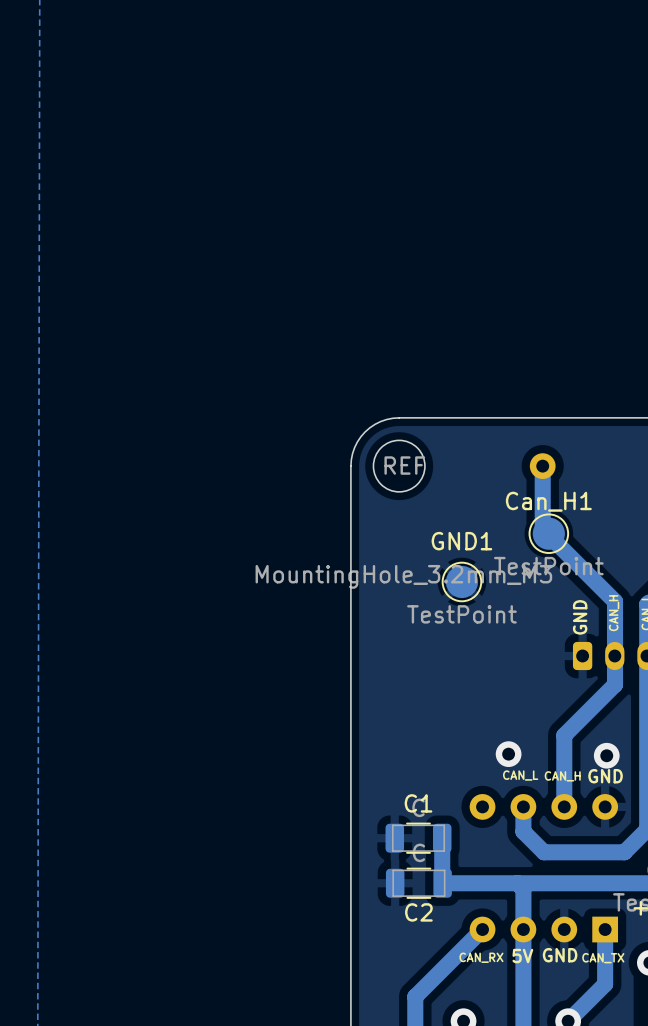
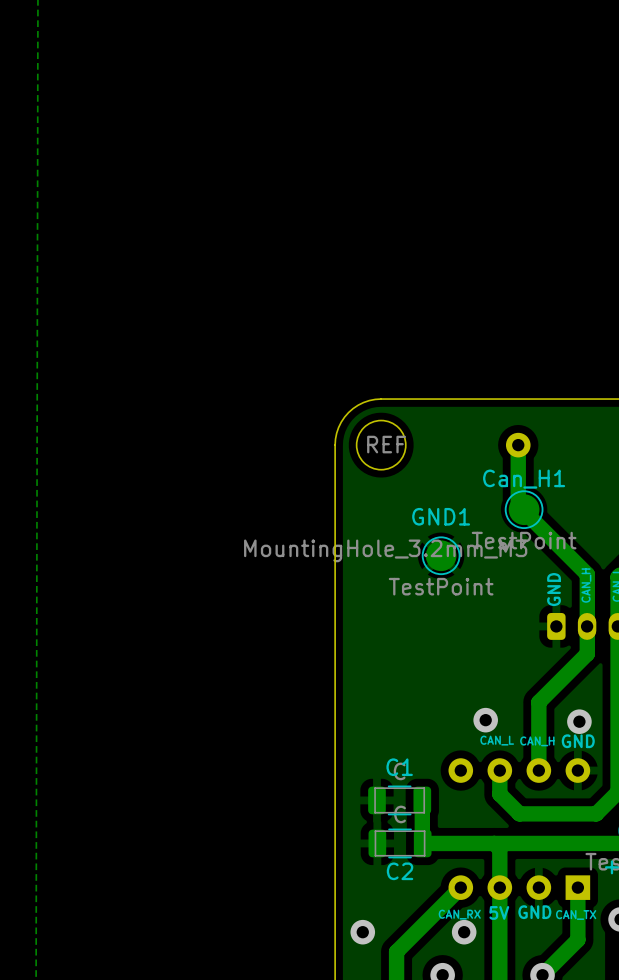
via: none -> (362, 932)
via: none -> (464, 932)

